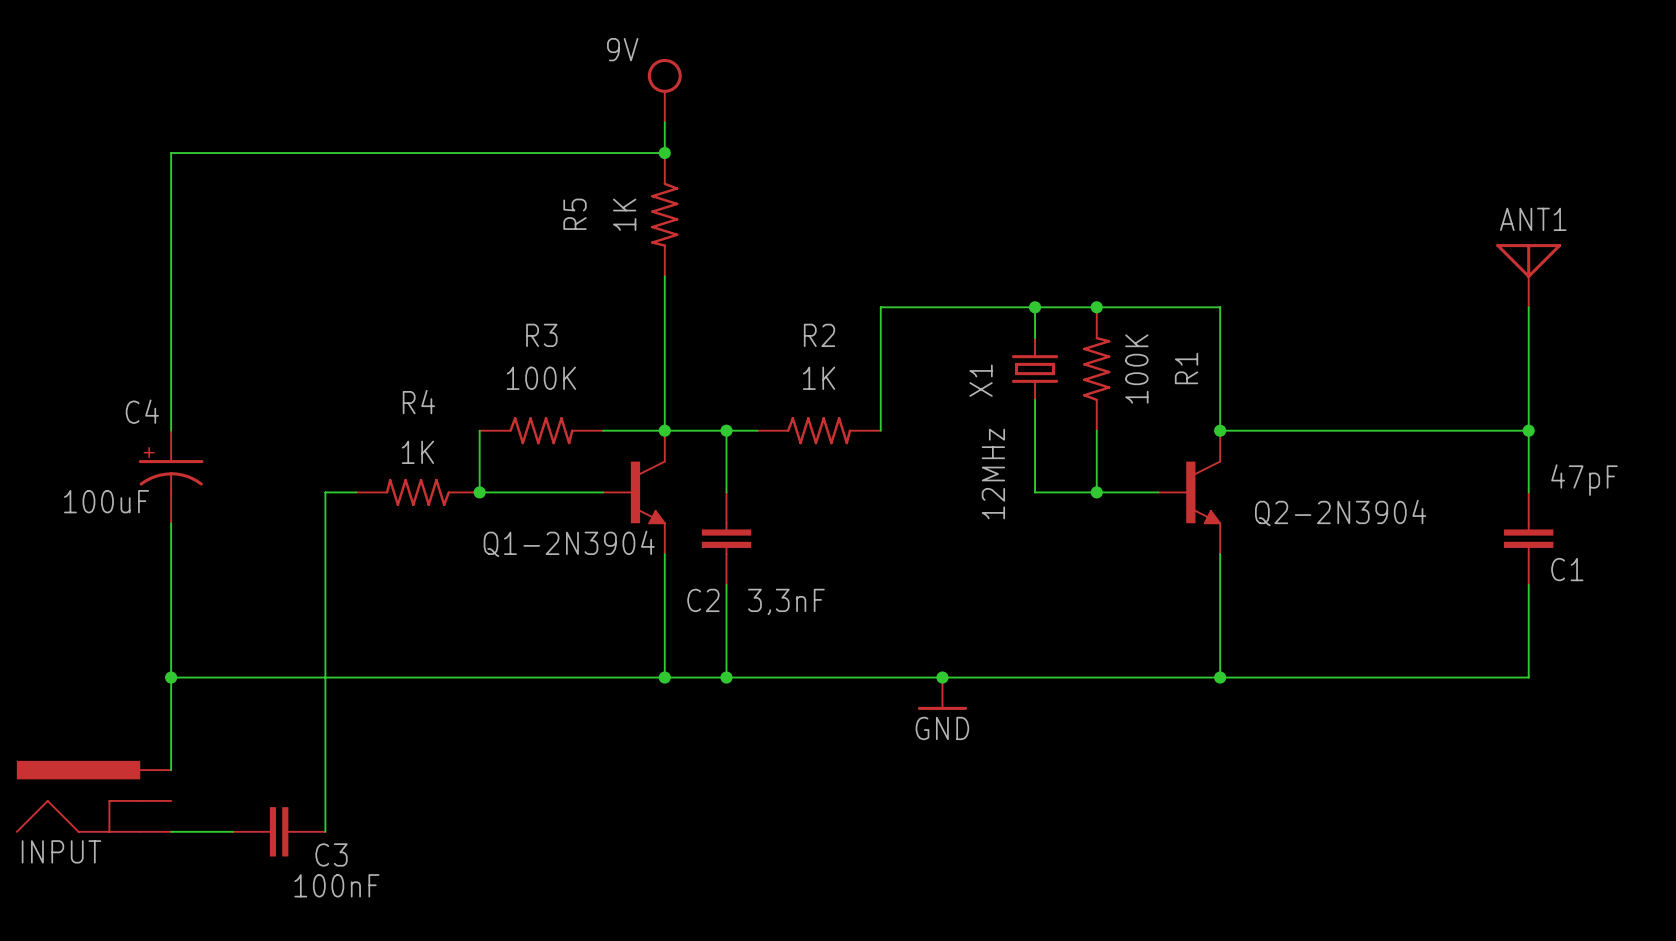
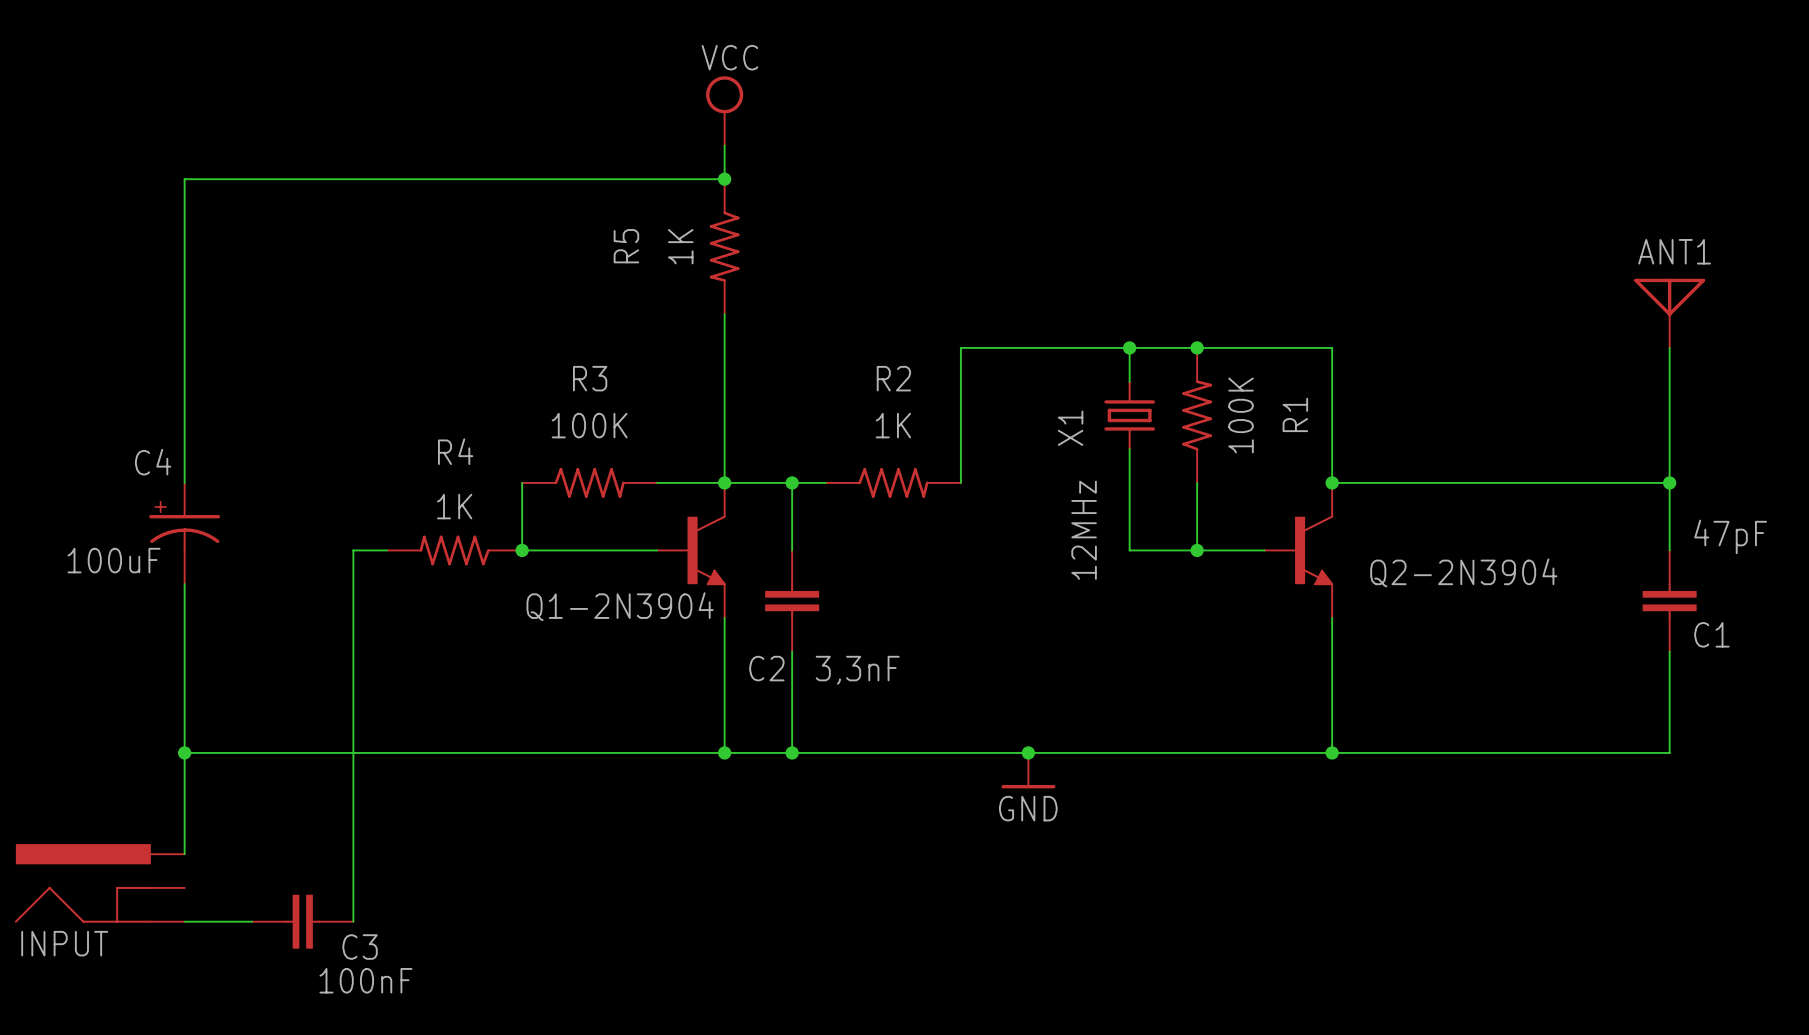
power symbol text: none -> VCC (729, 57)
power symbol text: 9V (622, 49) -> none

